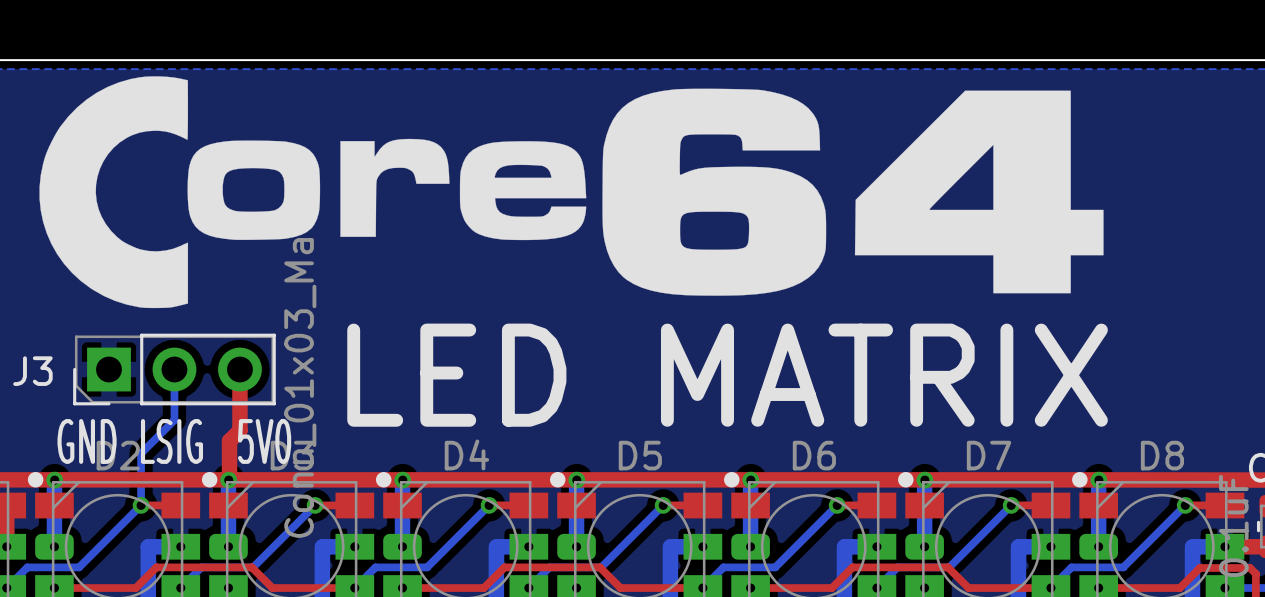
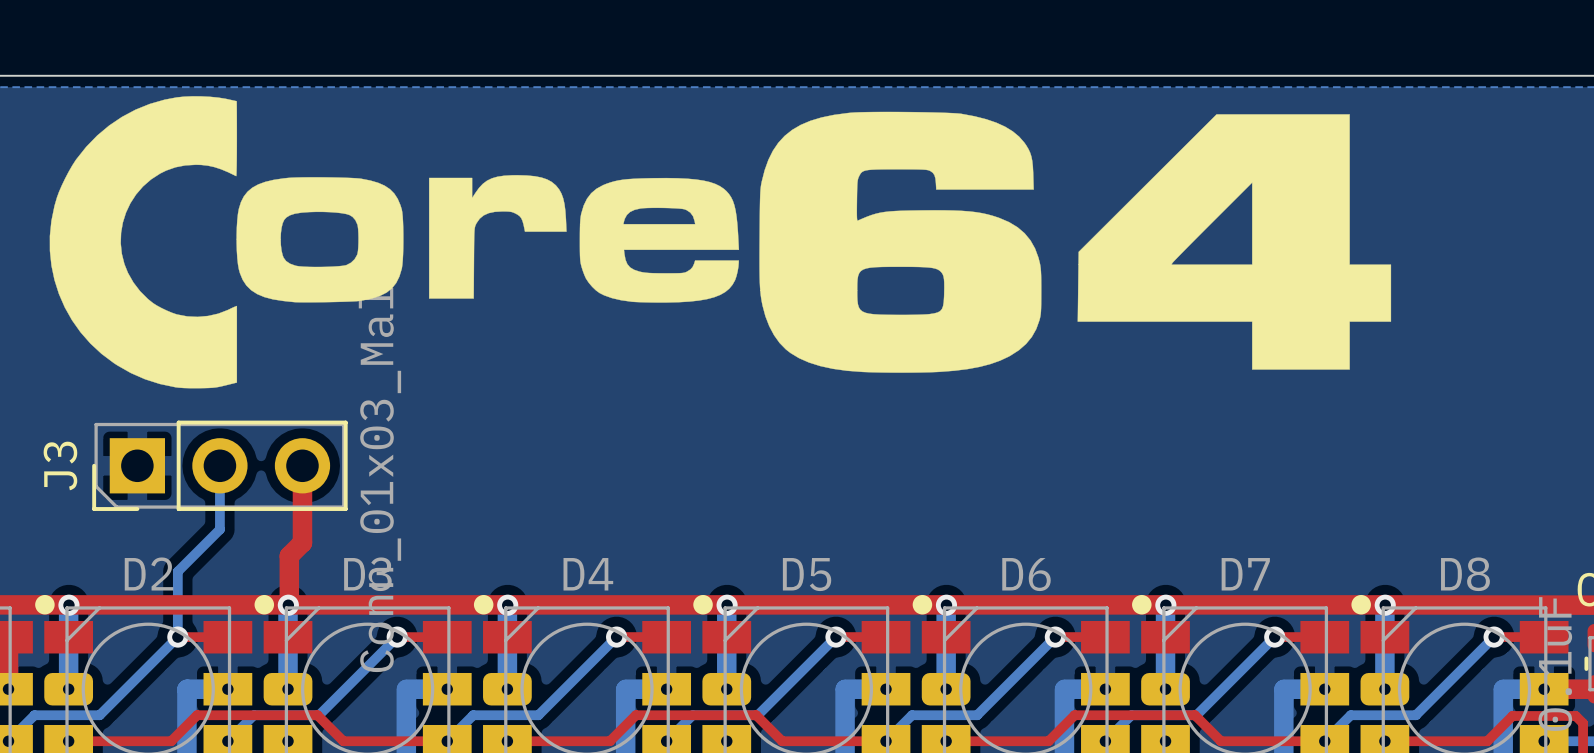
J3 name rotation: 0° (32, 371) -> 90° counterclockwise (60, 465)
text: LED MATRIX (727, 375) -> none
text: GND (87, 441) -> none
text: LSIG (171, 441) -> none
text: 5V0 (264, 441) -> none

